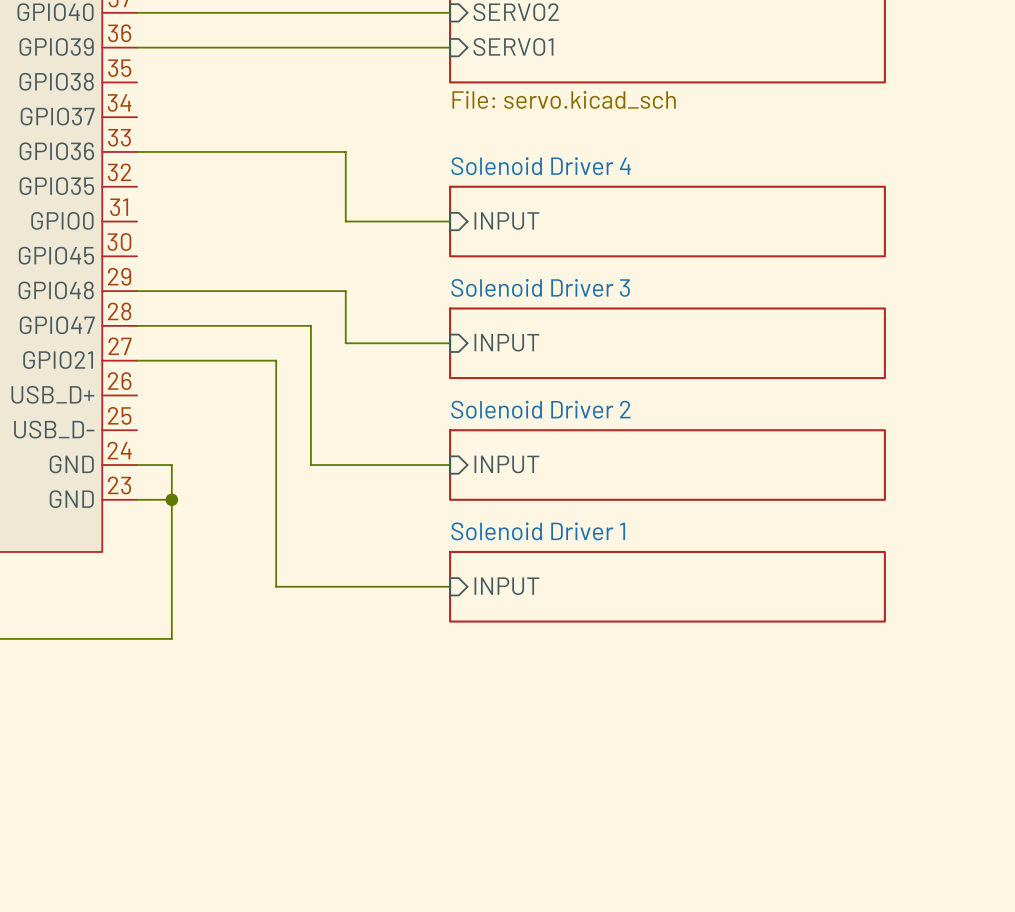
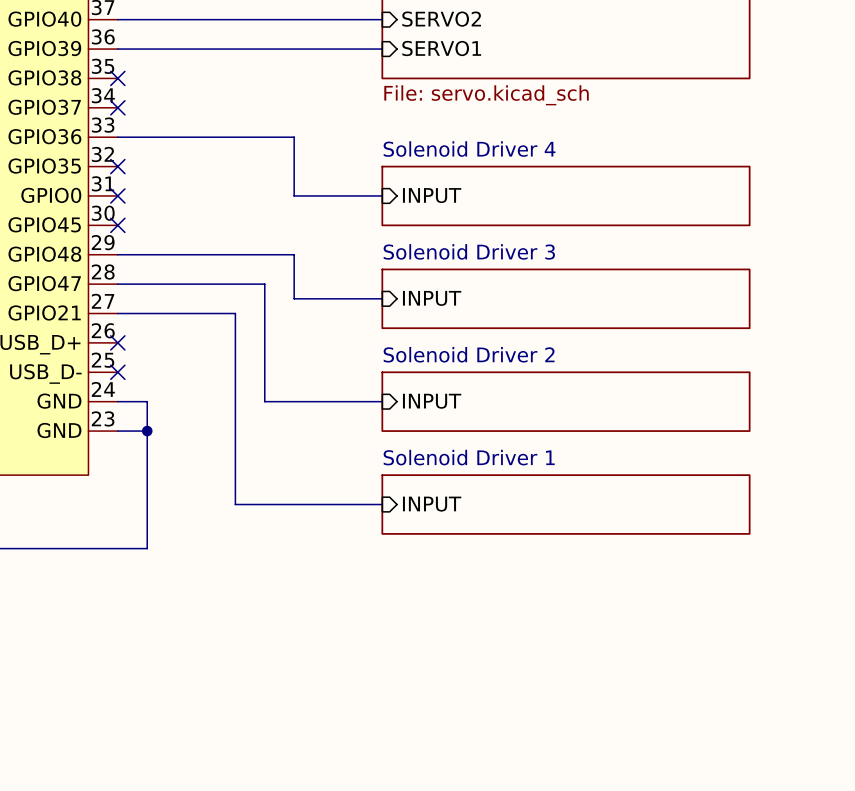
no-connect mark: none -> (117, 78)
no-connect mark: none -> (117, 107)
no-connect mark: none -> (117, 166)
no-connect mark: none -> (117, 195)
no-connect mark: none -> (117, 225)
no-connect mark: none -> (117, 342)
no-connect mark: none -> (117, 372)

